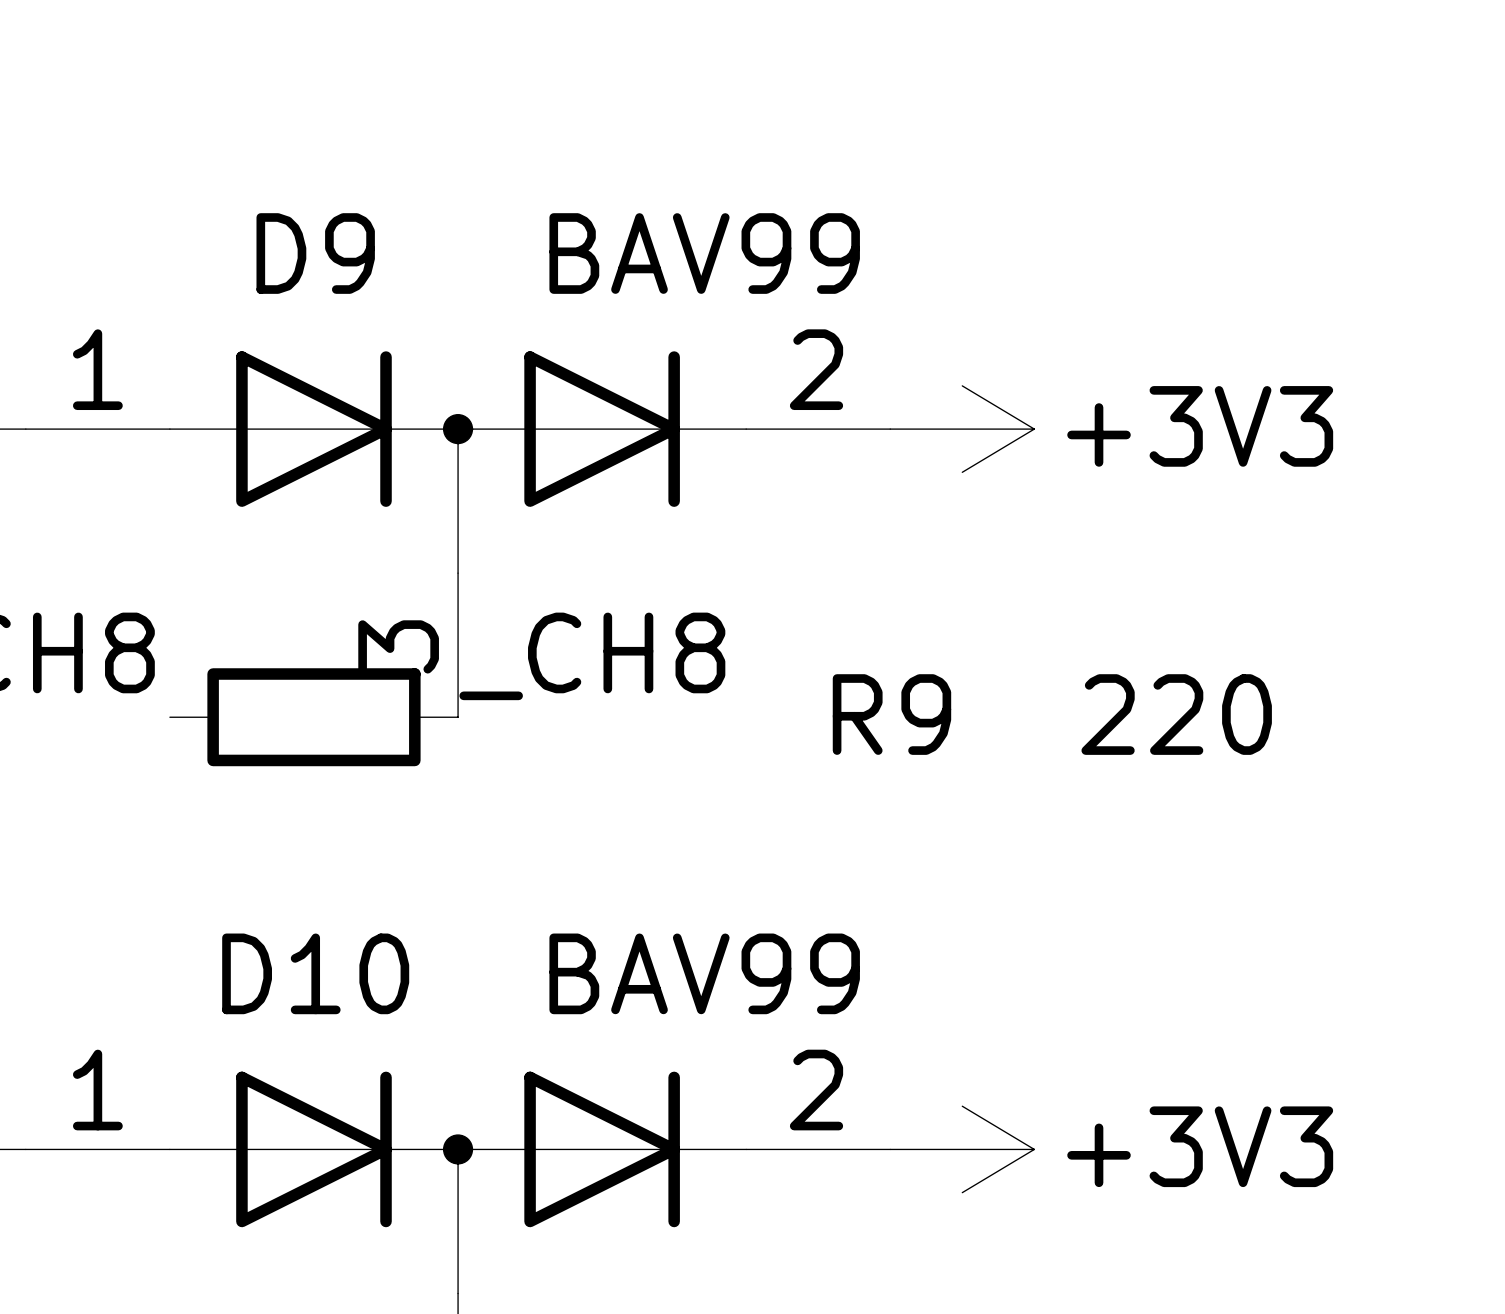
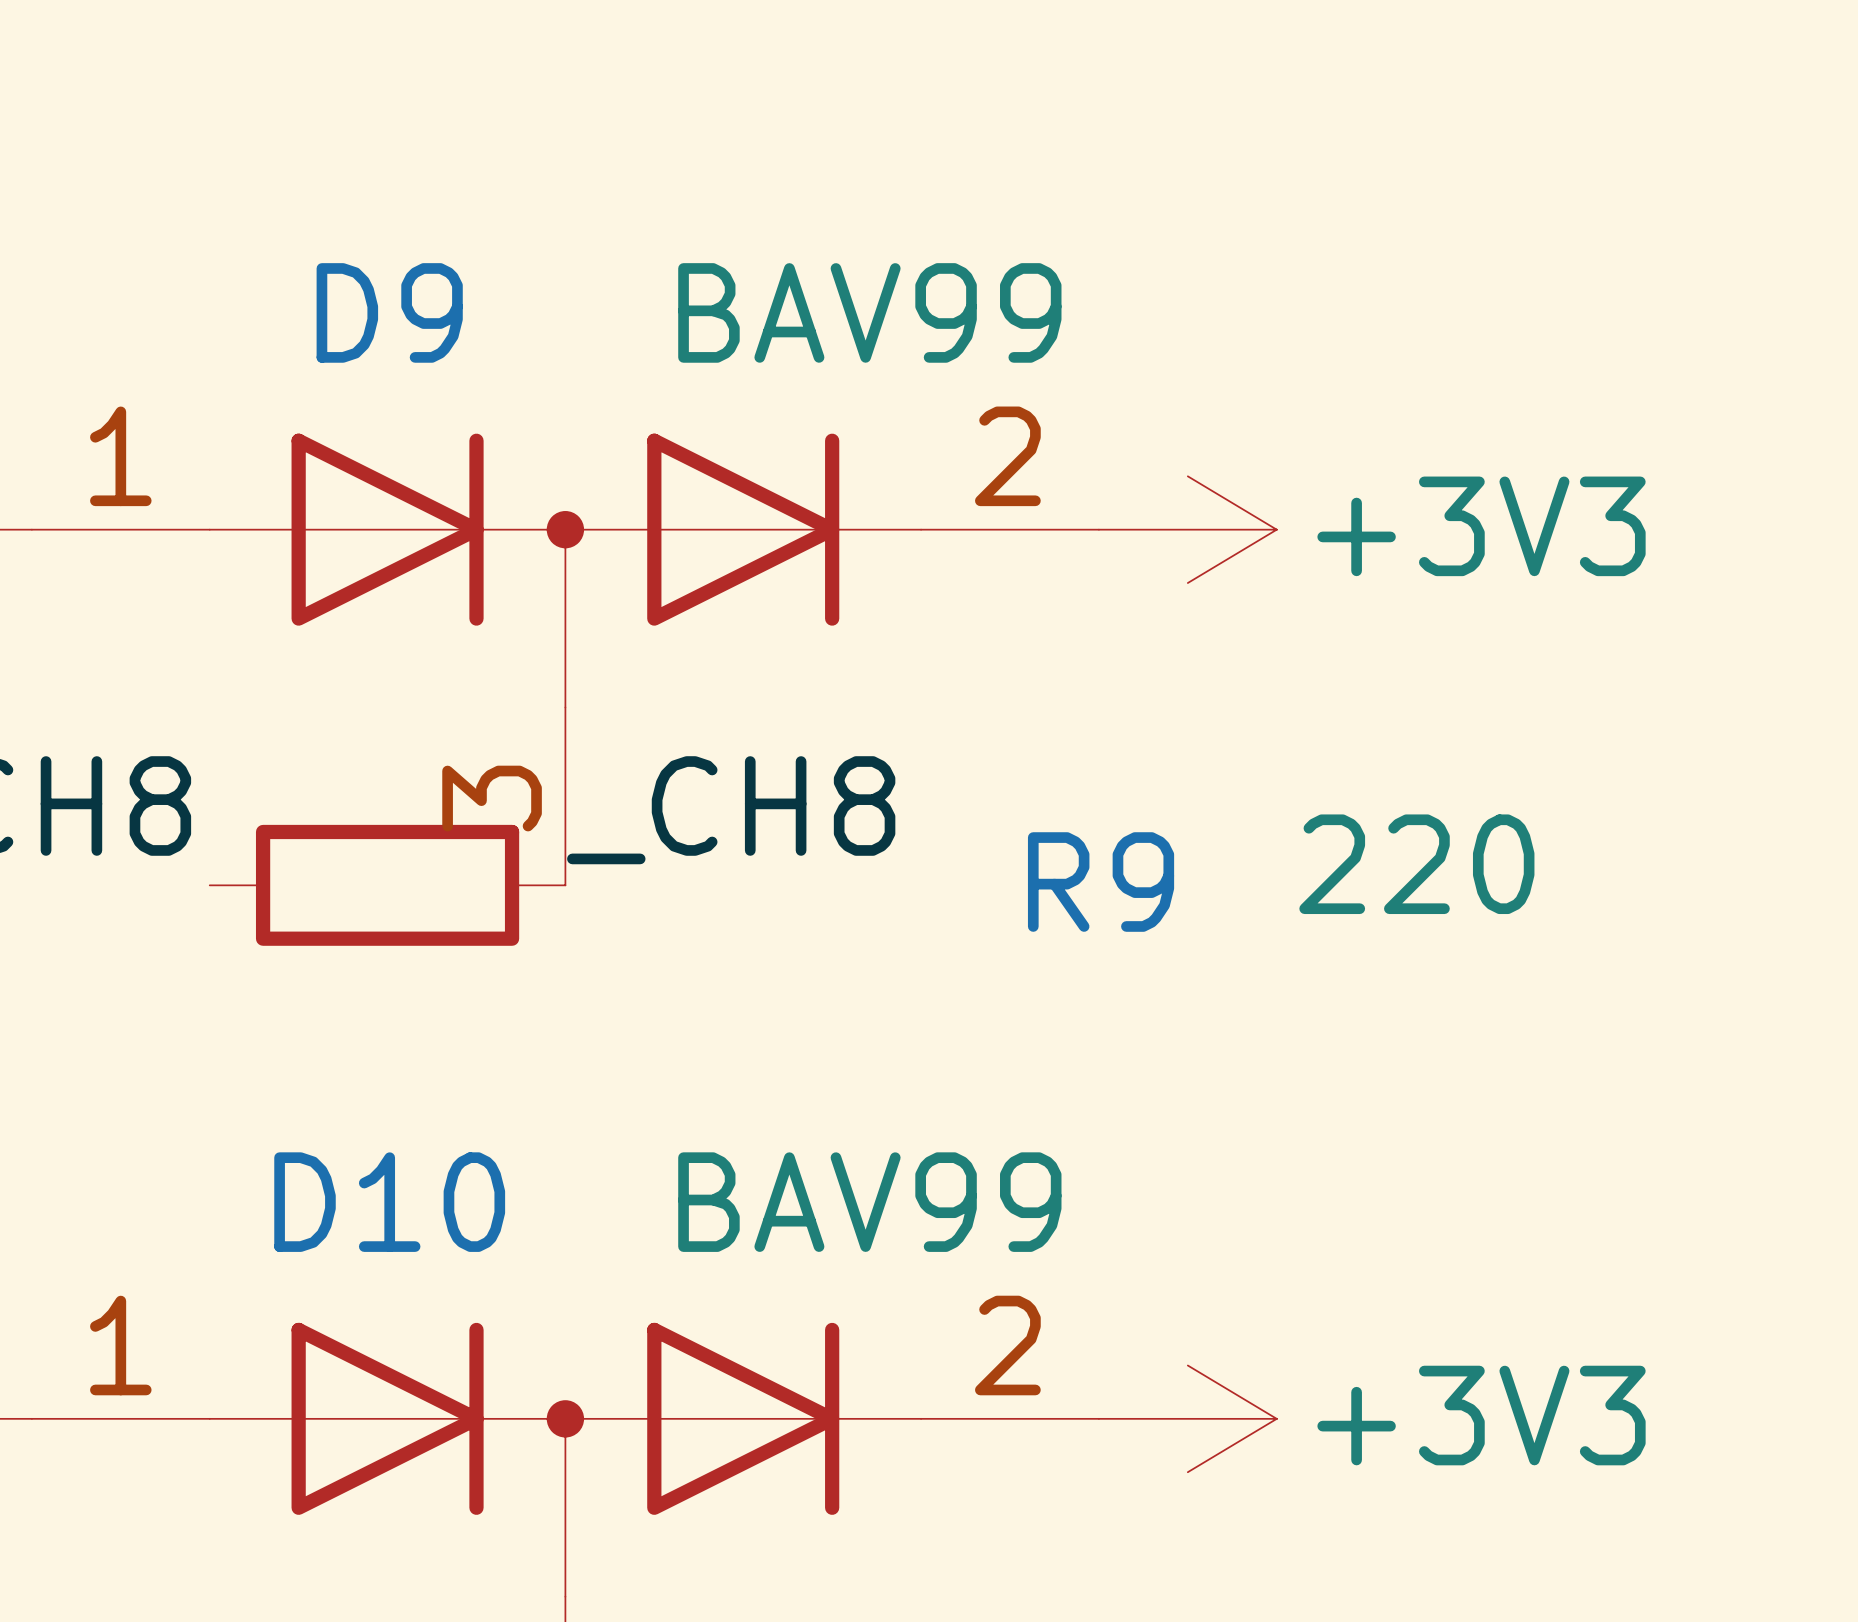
R9 value position: 220 (1176, 714) -> 220 (1416, 864)

